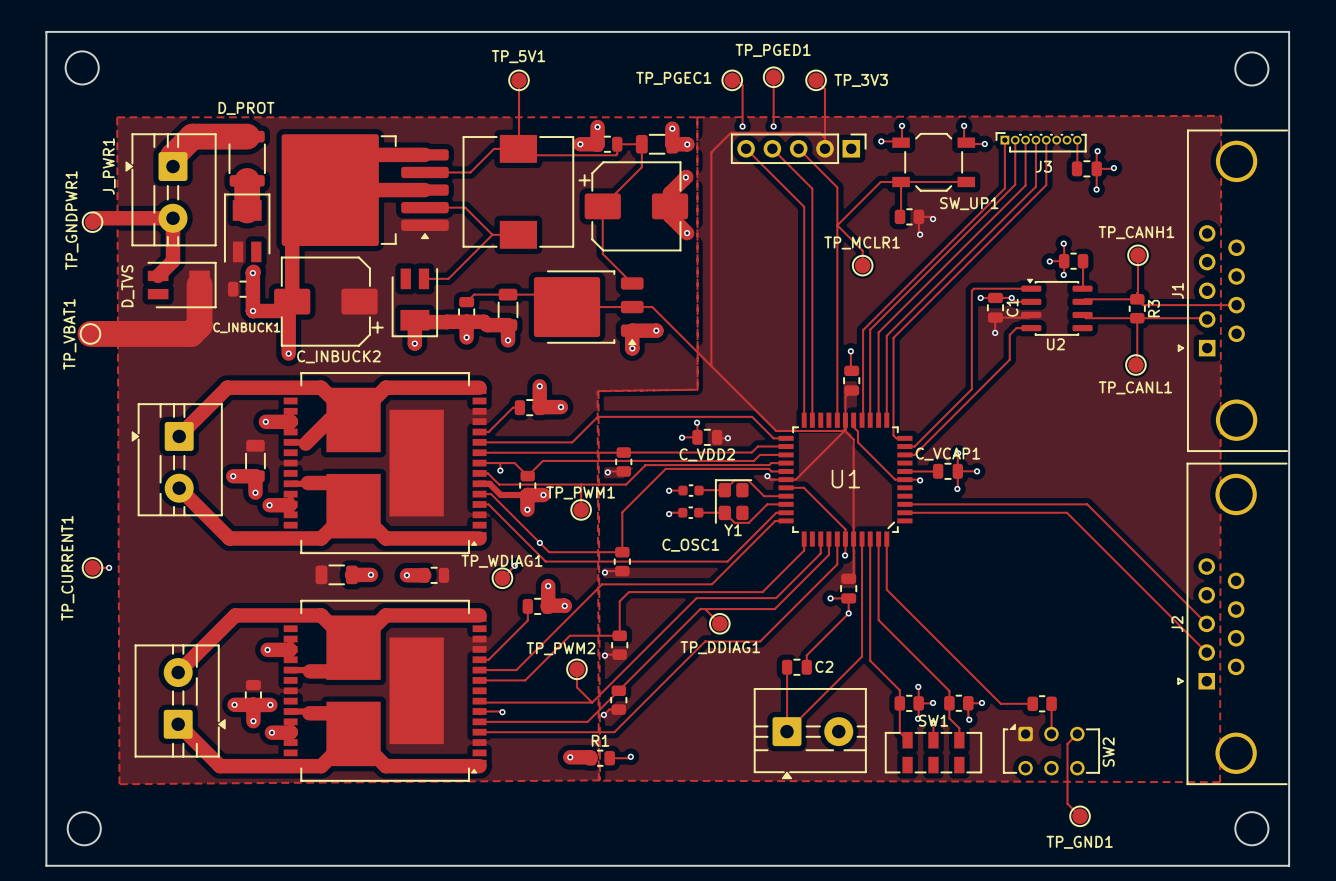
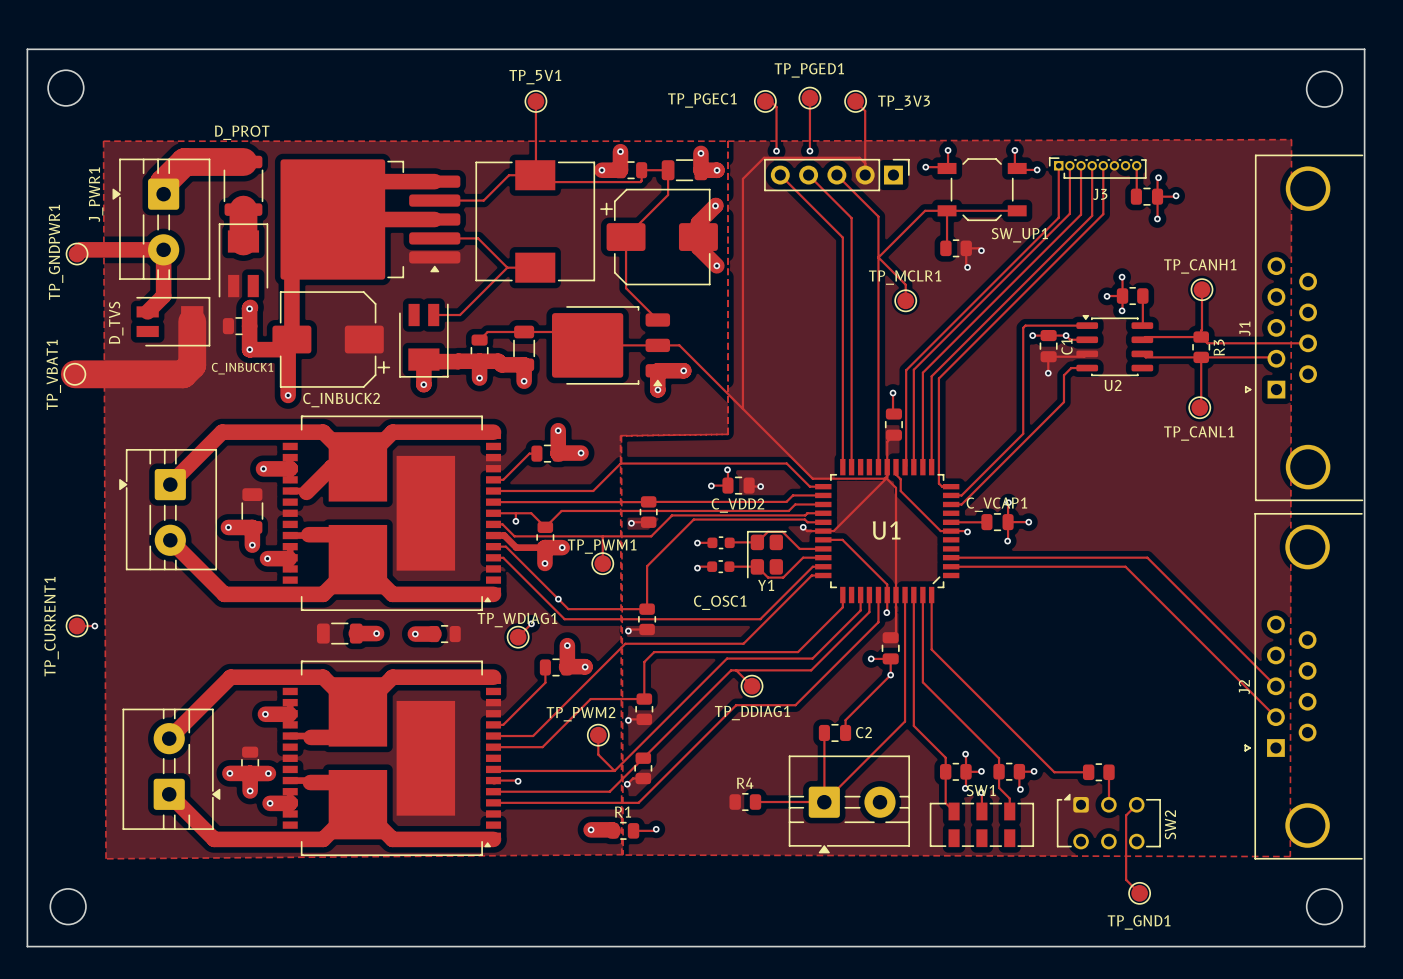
R4: none -> (745, 802)
track: none -> (755, 802) (824, 802)

